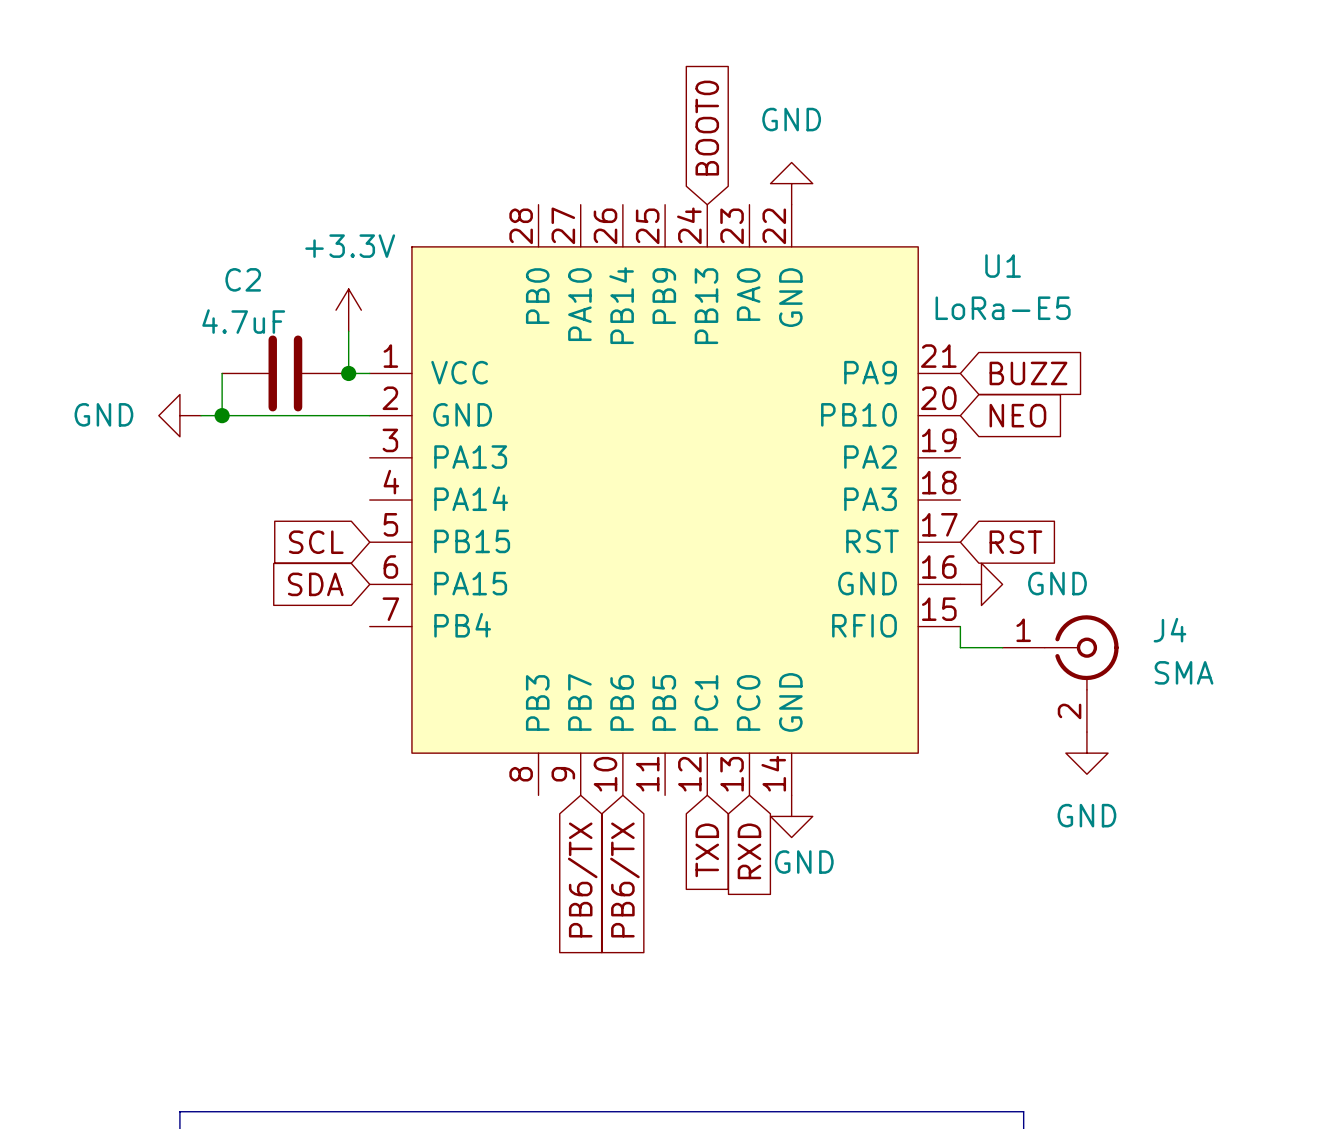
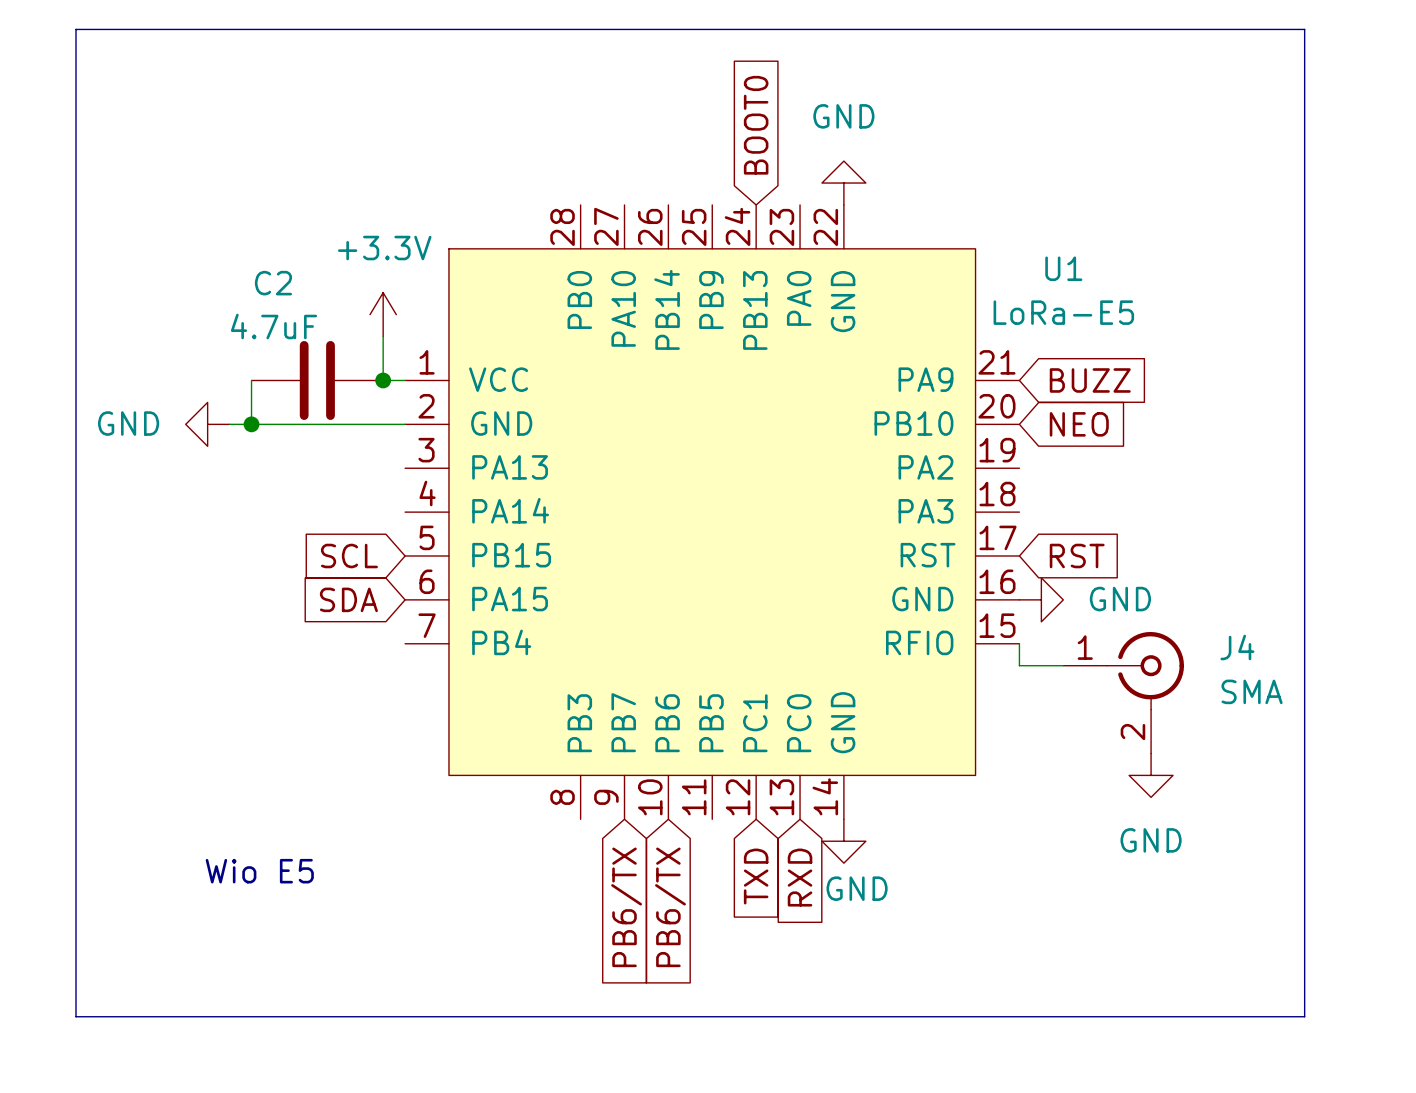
line: none -> (76, 29) (76, 1016) (1304, 1016) (1304, 29) (76, 29)
text: none -> Wio E5 (259, 871)

